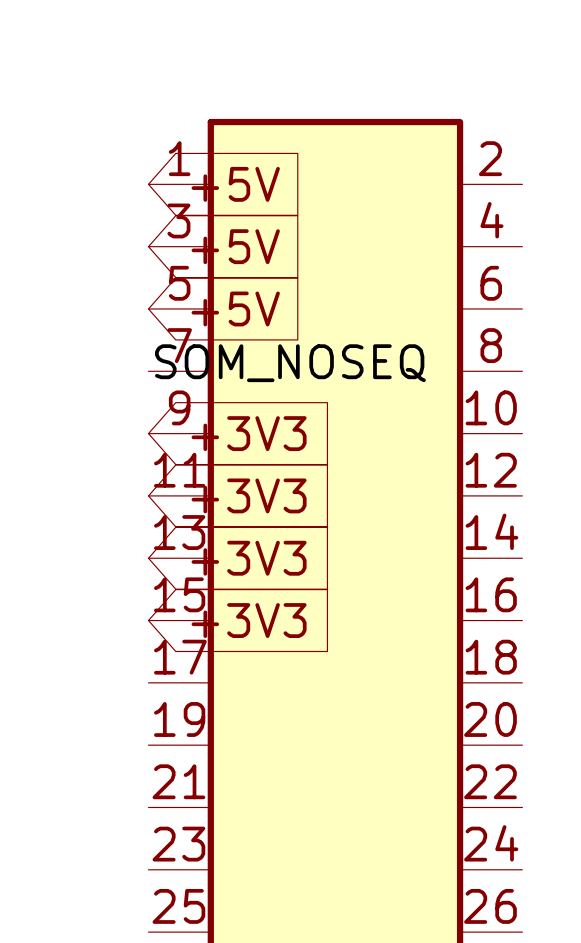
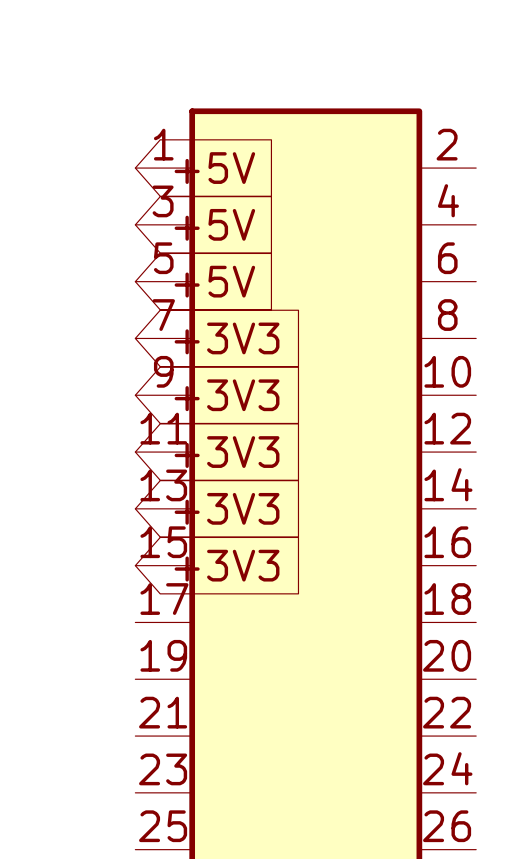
label: SOM_NOSEQ (290, 363) -> none
global label: none -> +3V3 (227, 338)

